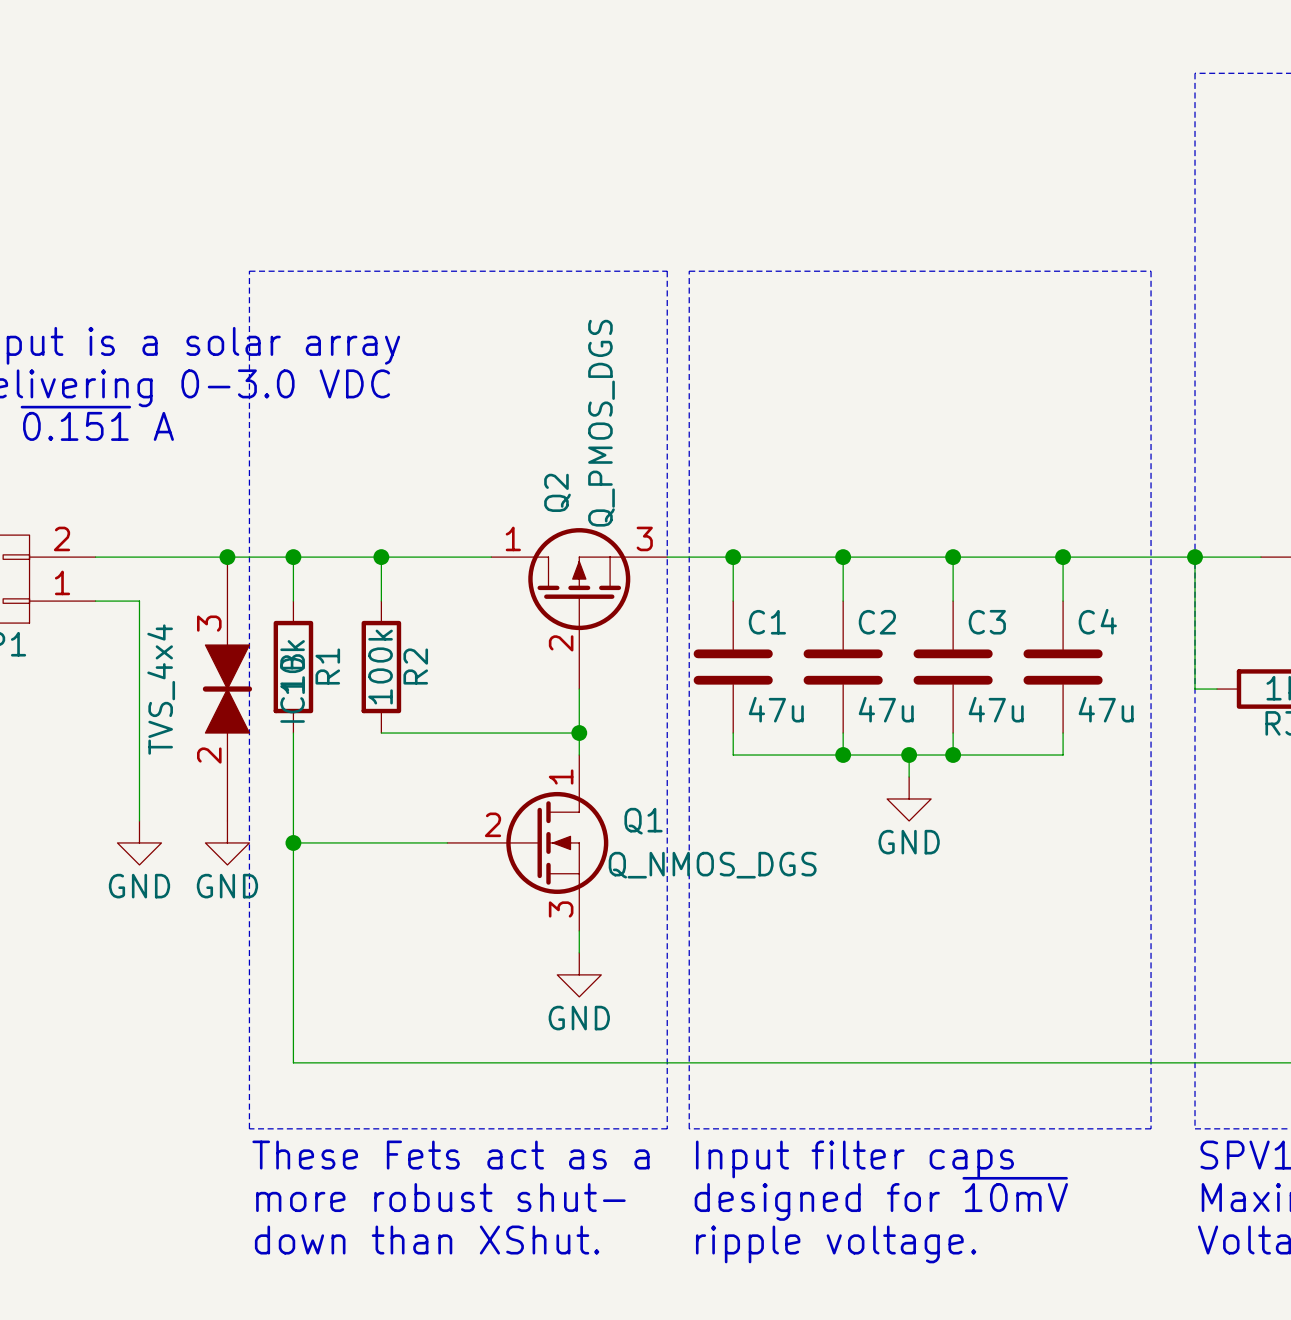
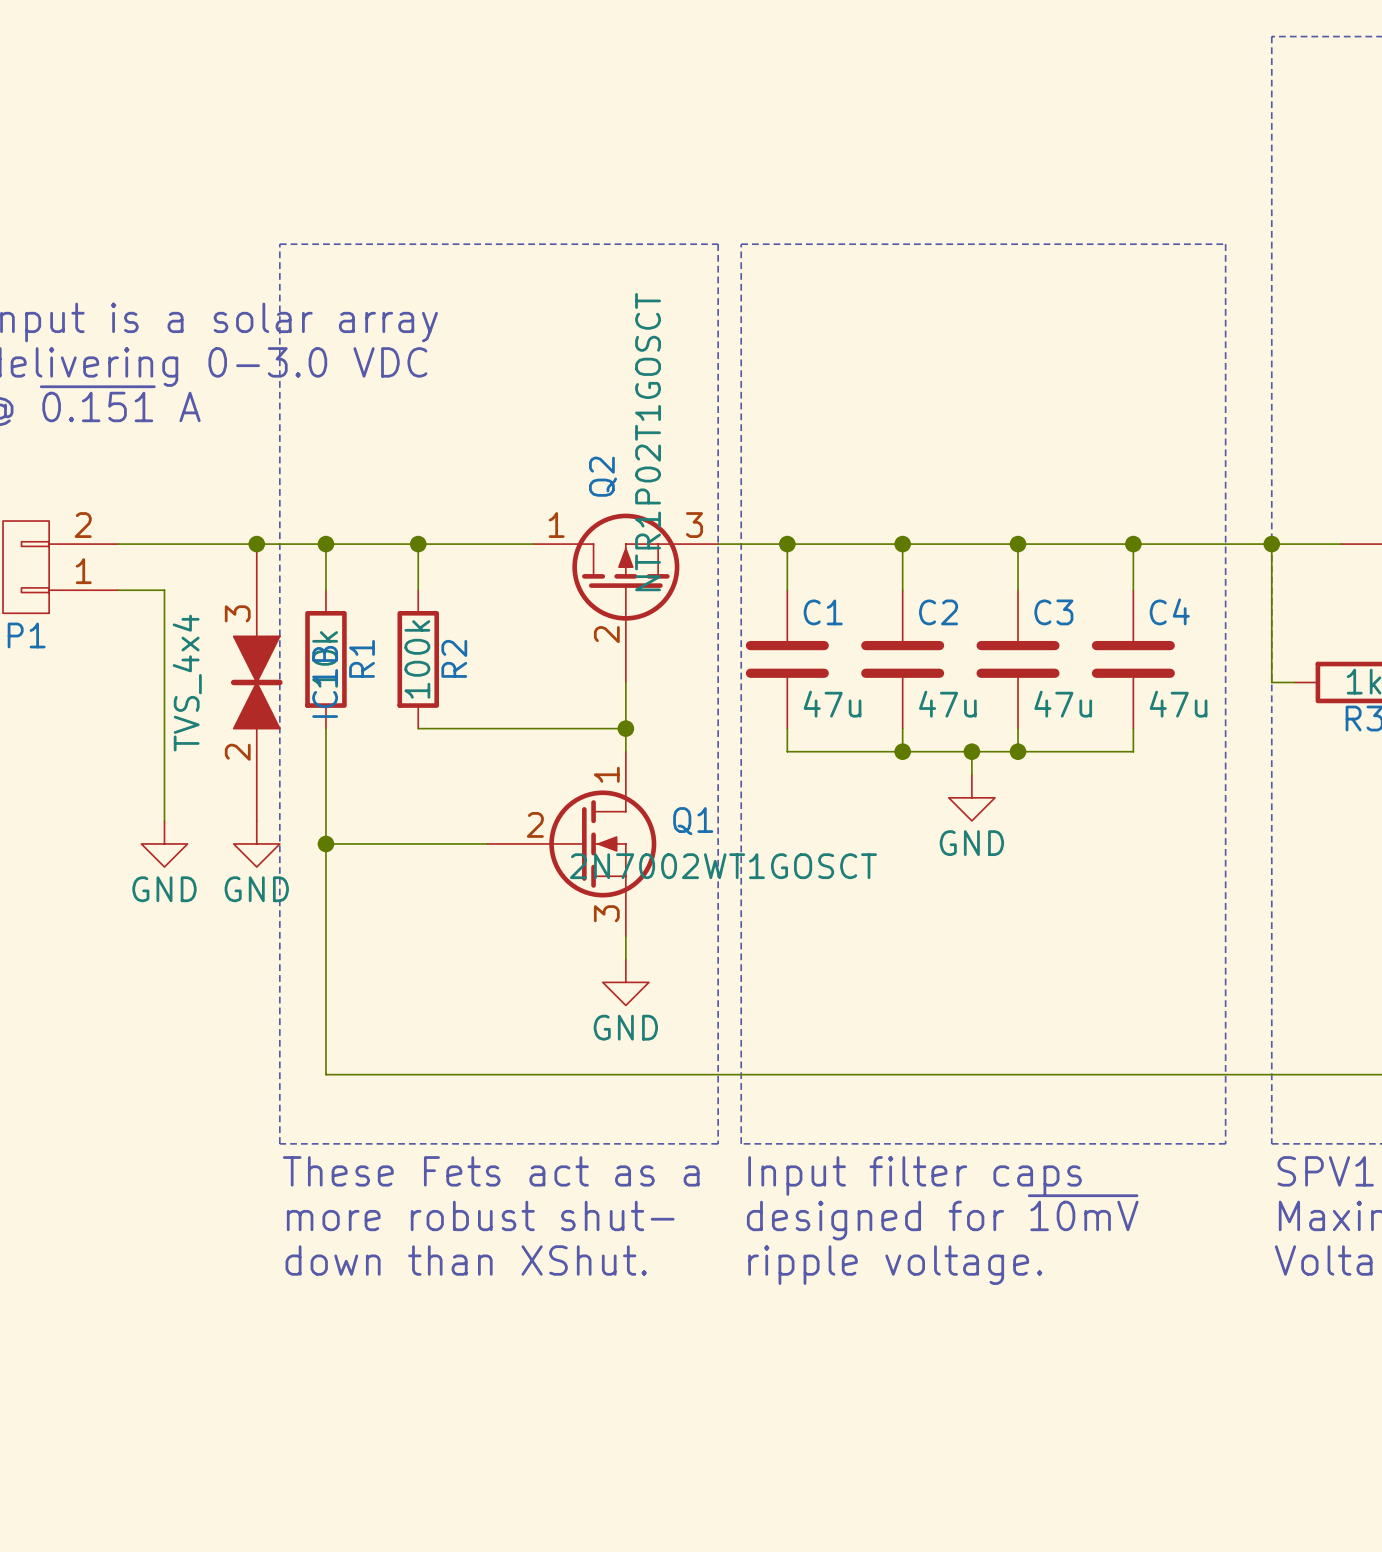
Q2 value: Q_PMOS_DGS (601, 423) -> NTR1P02T1GOSCT (648, 442)
Q1 value: Q_NMOS_DGS (712, 865) -> 2N7002WT1GOSCT (723, 866)

